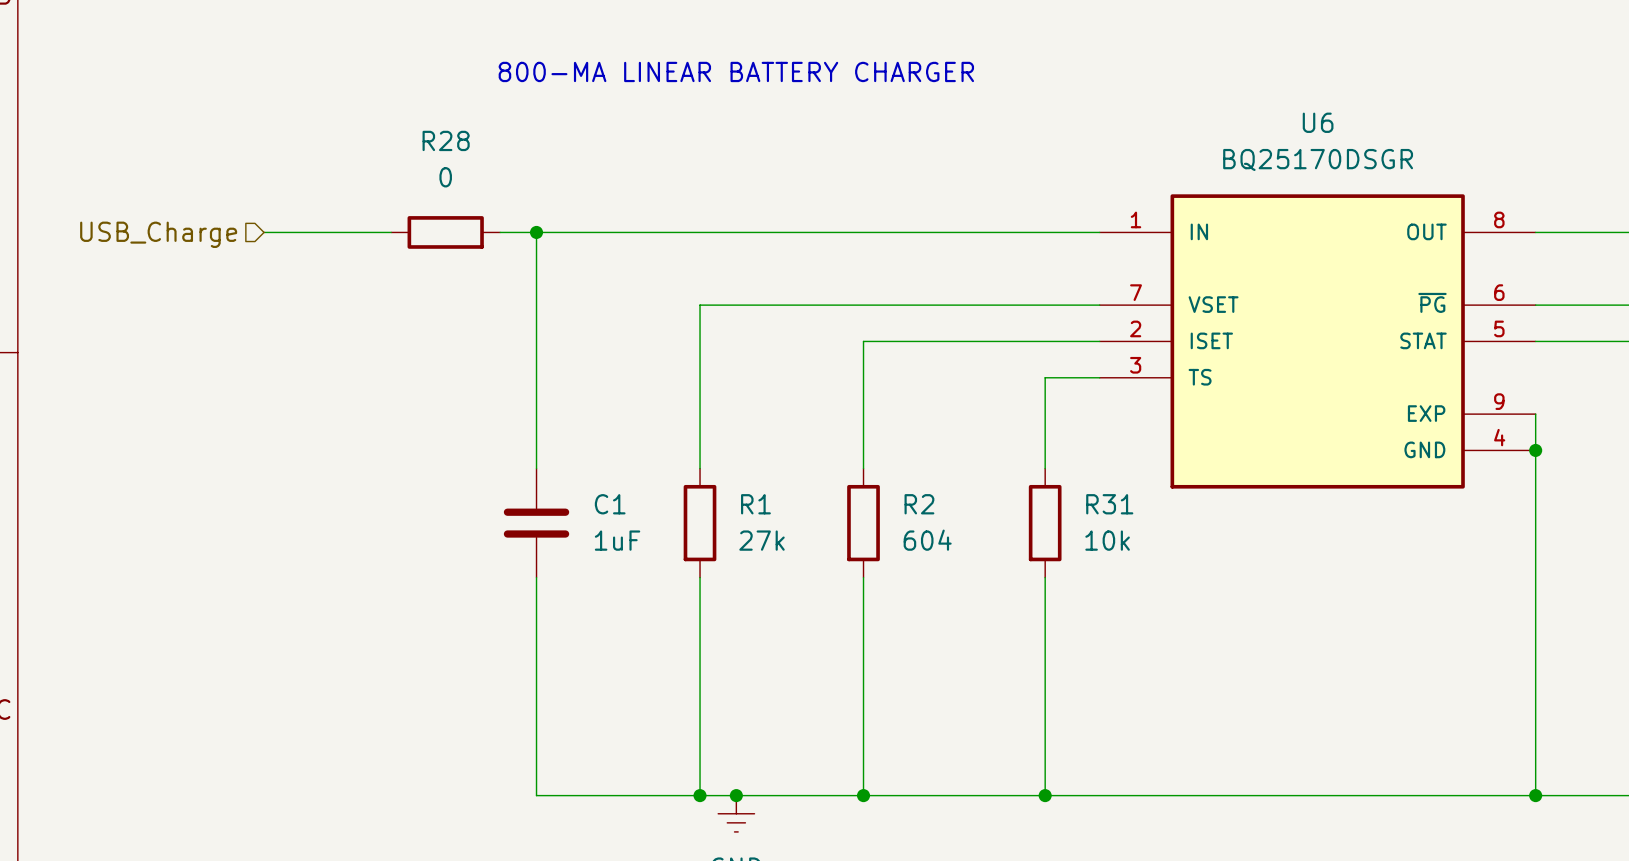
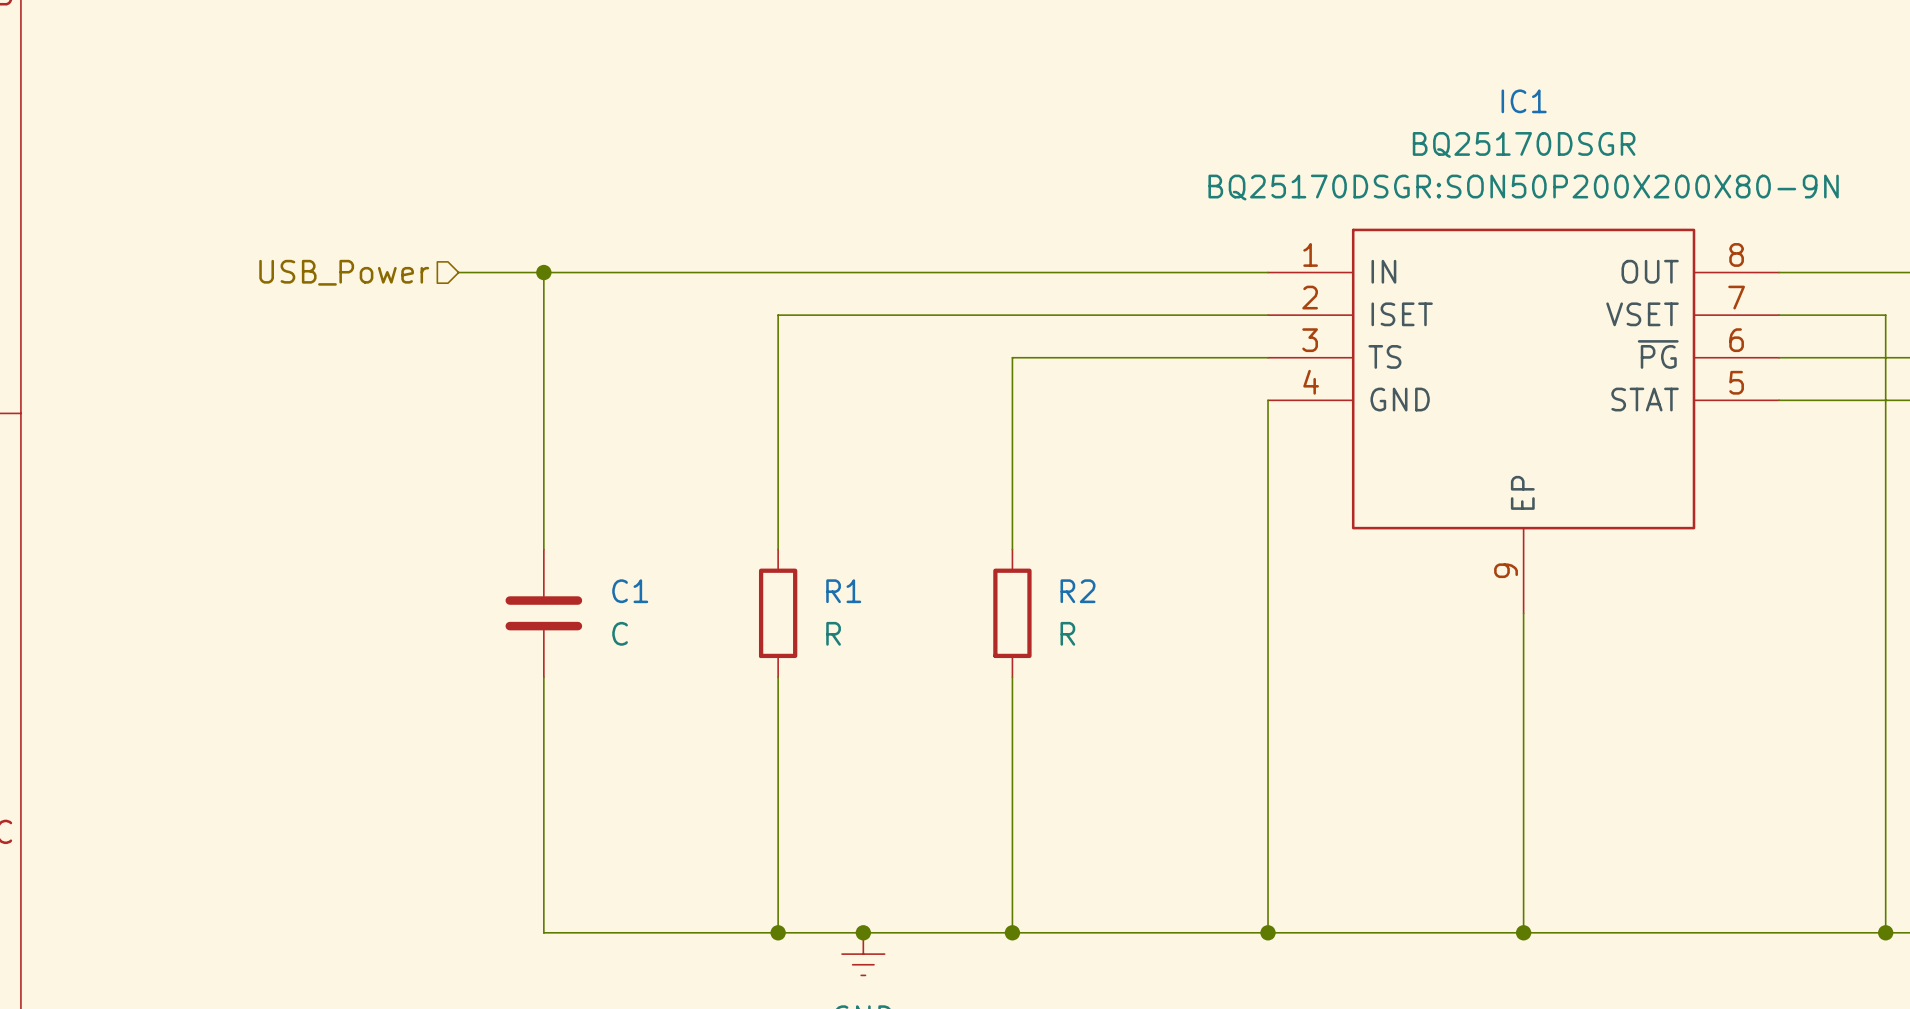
text: 800-MA LINEAR BATTERY CHARGER (736, 71) -> none
wire: (264, 232) (391, 232) -> (586, 272) (458, 272)
hierarchical label: none -> USB_Power (344, 272)
R28: 0 (445, 232) -> none
wire: (536, 232) (536, 468) -> (543, 272) (543, 549)
junction position: (536, 232) -> (543, 272)
hierarchical label: USB_Charge (158, 234) -> none
wire: none -> (1268, 315) (778, 315) (778, 549)
wire: none -> (1779, 315) (1885, 315) (1885, 932)
wire: (863, 305) (700, 305) (700, 468) -> (1012, 357) (1012, 400)
wire: (863, 341) (1099, 341) -> none
wire: none -> (1268, 400) (1268, 932)
U6: BQ25170DSGR (1317, 341) -> none
IC1: none -> BQ25170DSGR (1523, 420)
wire: (1099, 377) (1045, 377) (1045, 468) -> none
wire: (1535, 414) (1535, 795) -> none
junction: (1535, 450) -> none
C1 position: (536, 523) -> (543, 613)
R1 position: (700, 523) -> (778, 613)
R31: 10k (1045, 523) -> none
wire: none -> (1523, 613) (1523, 932)
C1 value: 1uF (617, 540) -> C (620, 633)
R1 value: 27k (762, 540) -> R (833, 633)
R2 value: 604 (927, 540) -> R (1067, 633)
wire: (536, 577) (536, 795) -> (543, 677) (543, 932) (629, 932)
wire: (700, 577) (700, 795) -> (778, 677) (778, 932)
wire: (1045, 577) (1045, 795) -> none
junction position: (700, 795) -> (778, 932)
junction position: (1045, 795) -> (1268, 932)
junction: none -> (1523, 932)
junction position: (1535, 795) -> (1885, 932)

